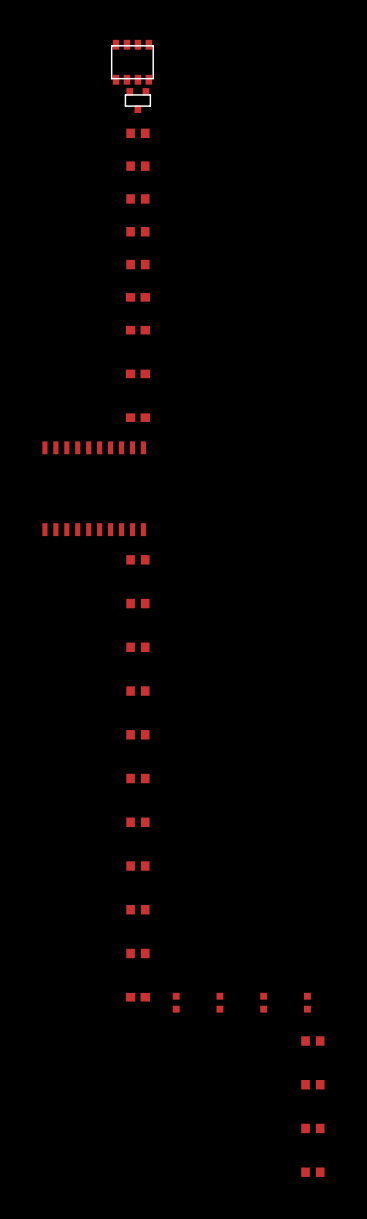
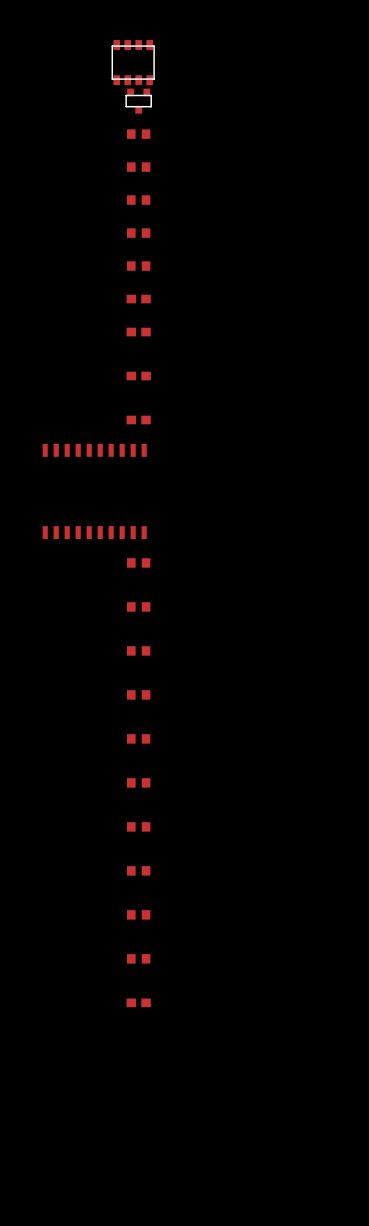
part: (176, 1002) -> none
part: (219, 1002) -> none
part: (263, 1002) -> none
part: (307, 1002) -> none
part: (312, 1040) -> none
part: (312, 1084) -> none
part: (312, 1128) -> none
part: (312, 1172) -> none

